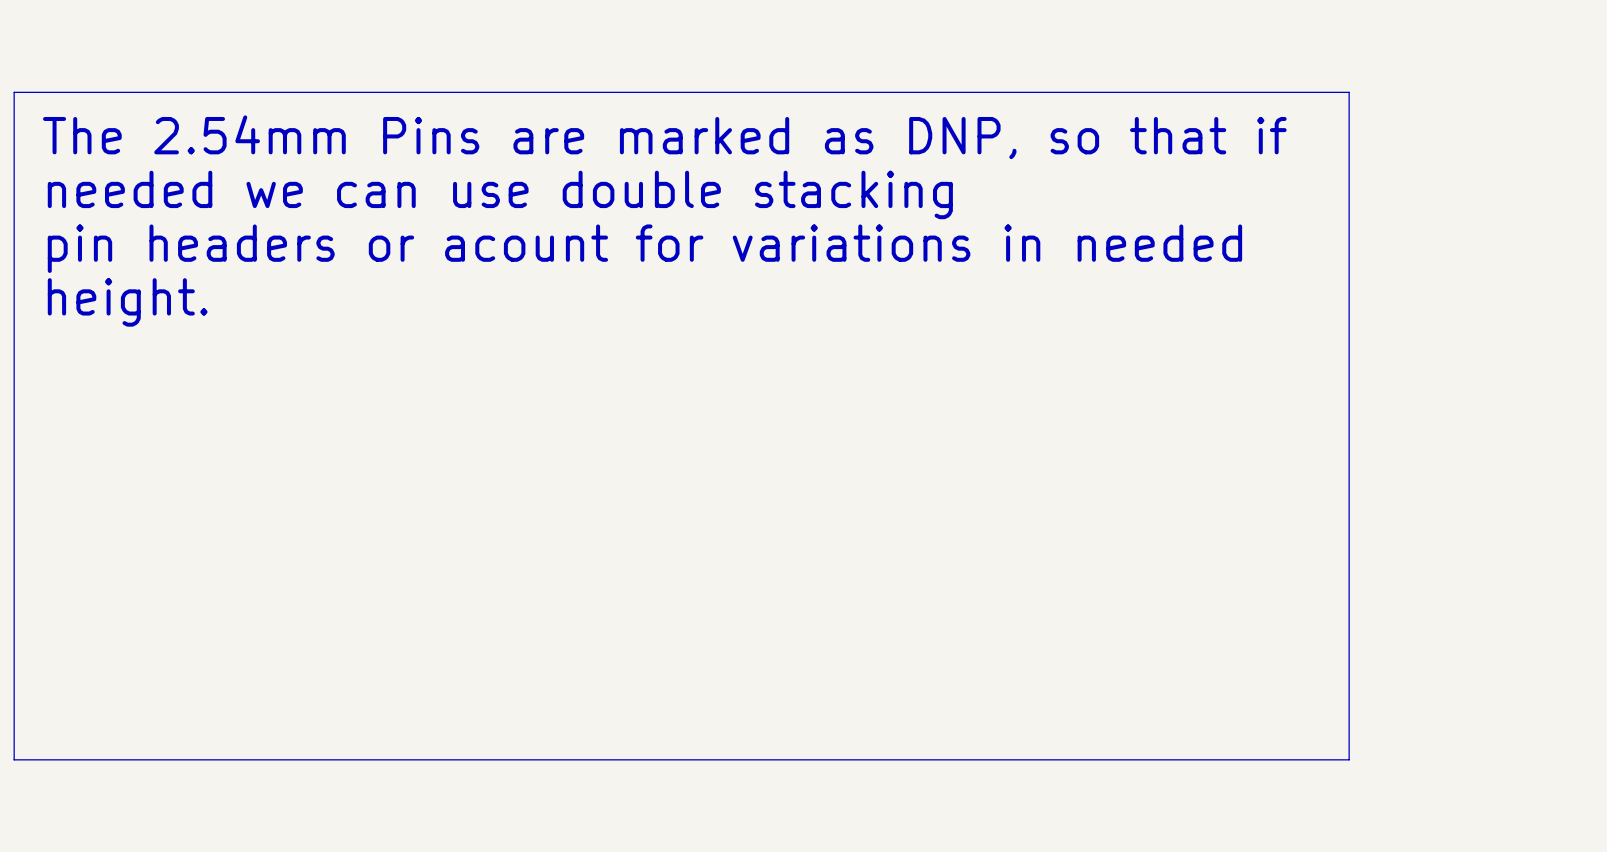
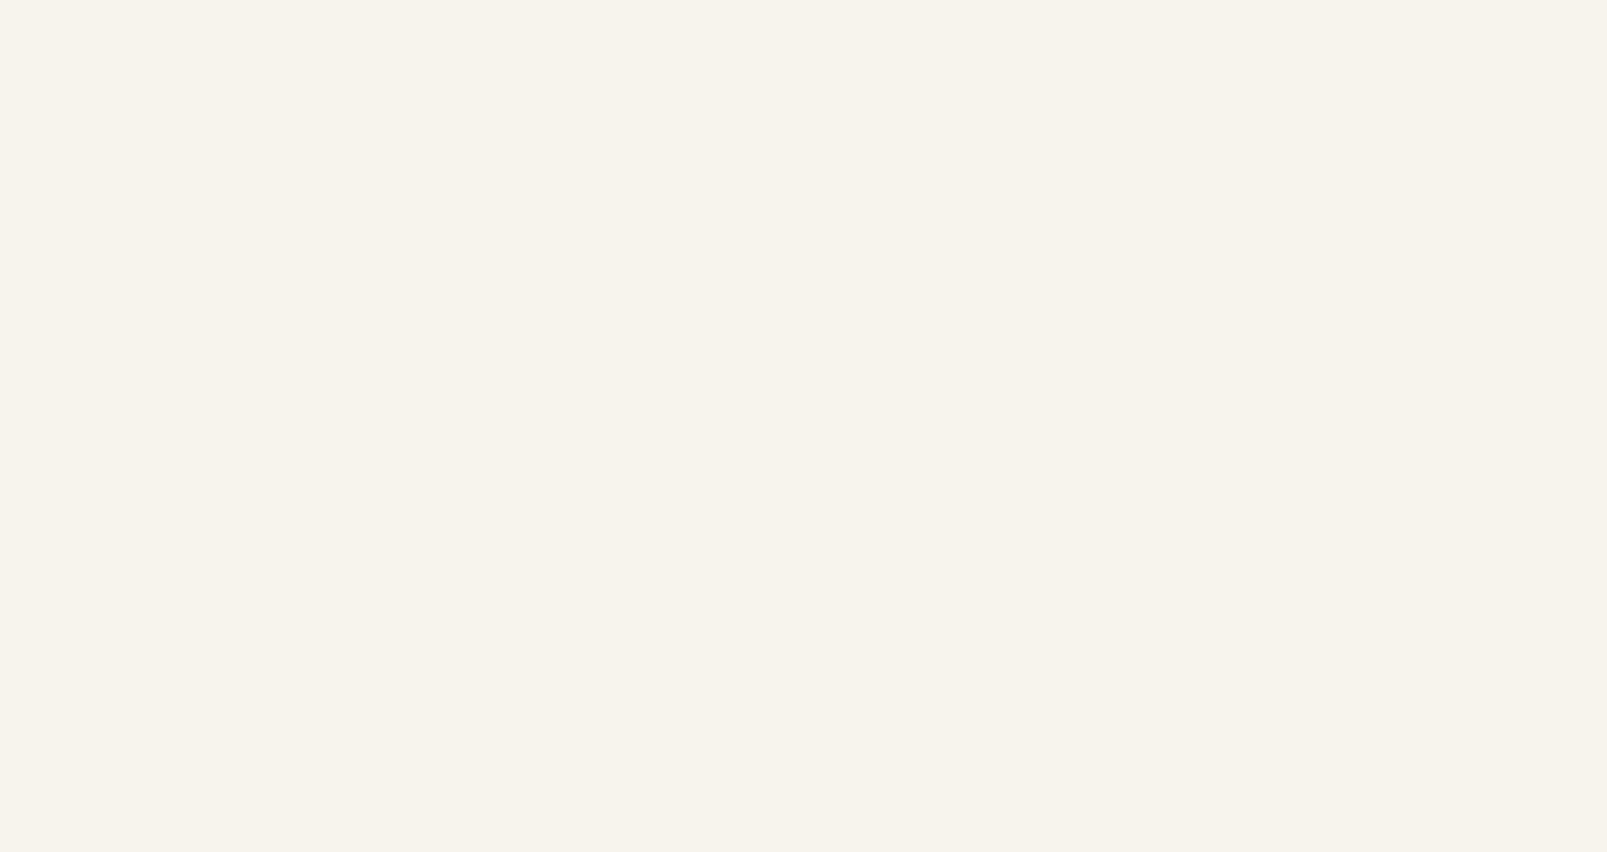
line: (14, 92) (1349, 92) (1349, 759) (14, 759) (14, 92) -> none
text: The 2.54mm Pins are marked as DNP, so that if (664, 137) -> none
text: needed we can use double stacking (500, 194) -> none
text: pin headers or acount for variations in needed (644, 248) -> none
text: height. (127, 302) -> none

